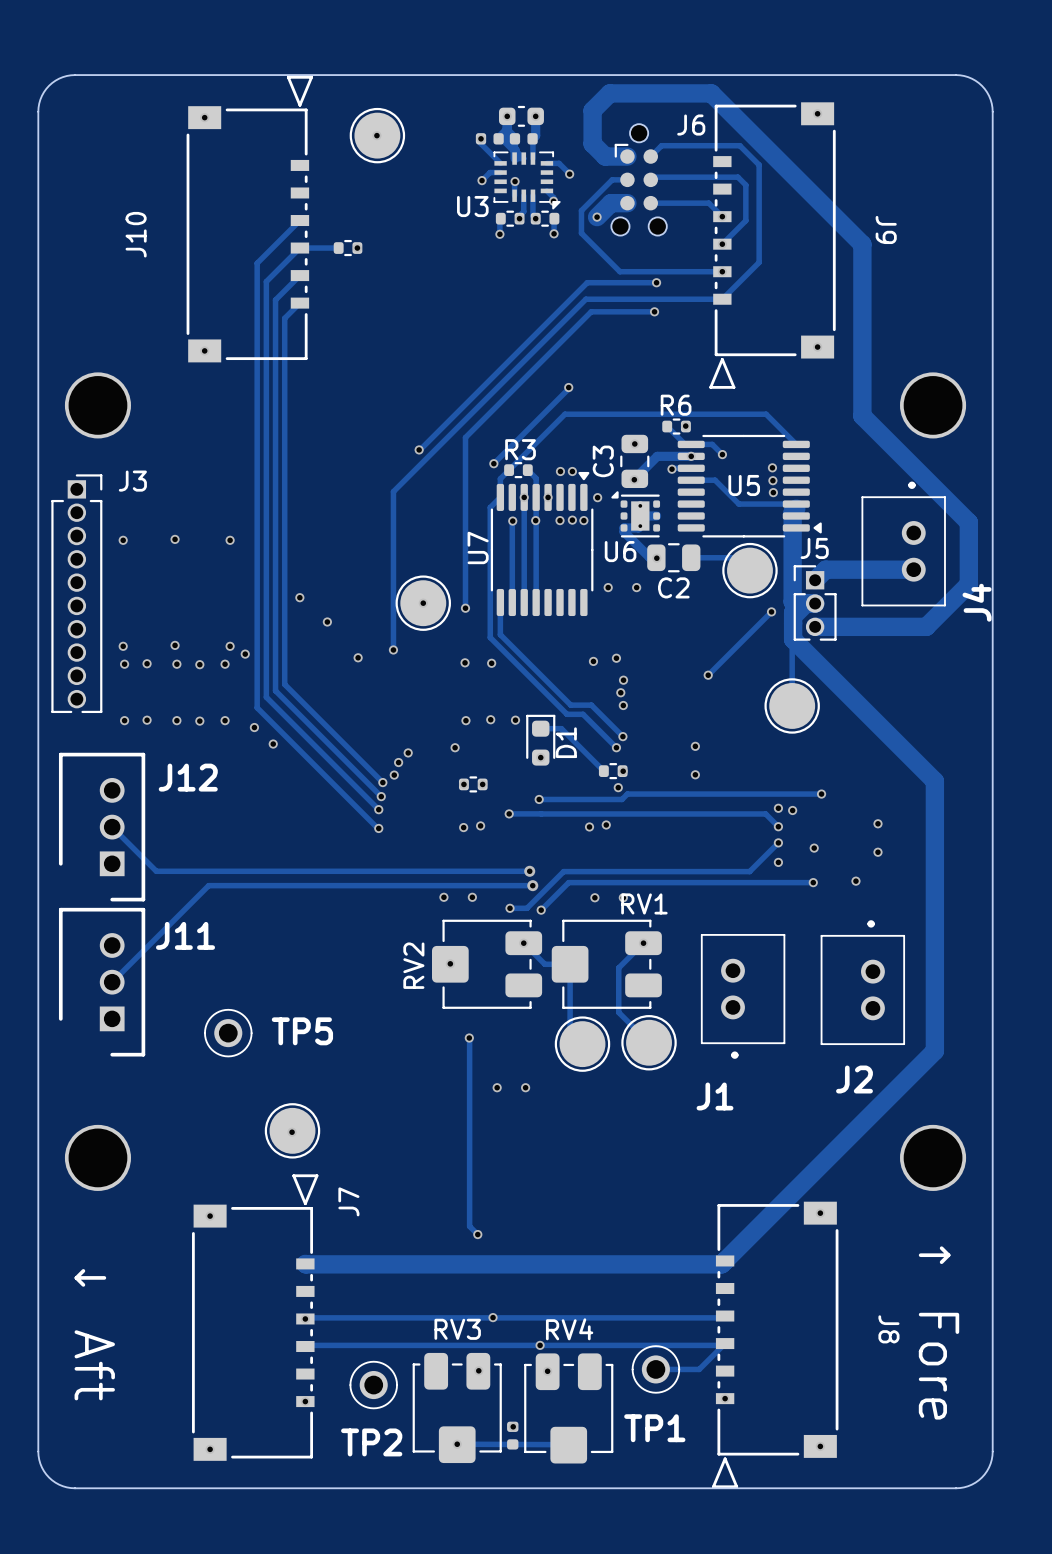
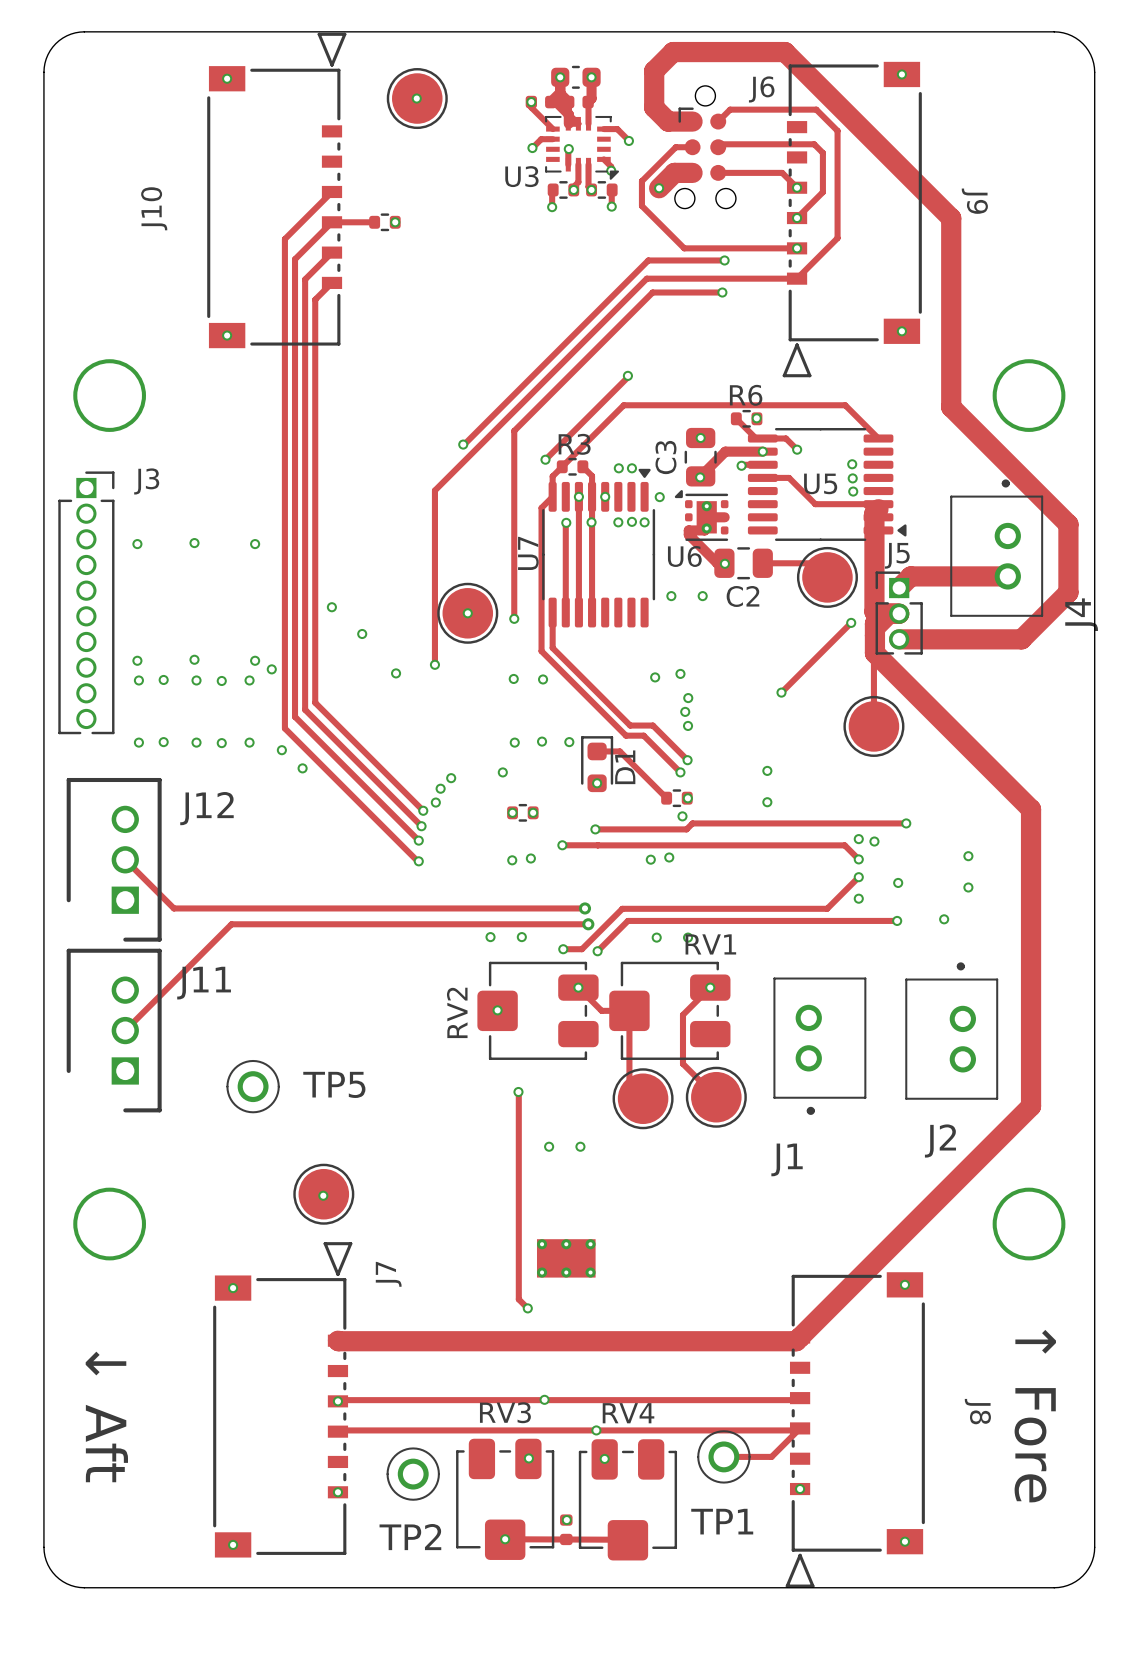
part: none -> (566, 1258)

